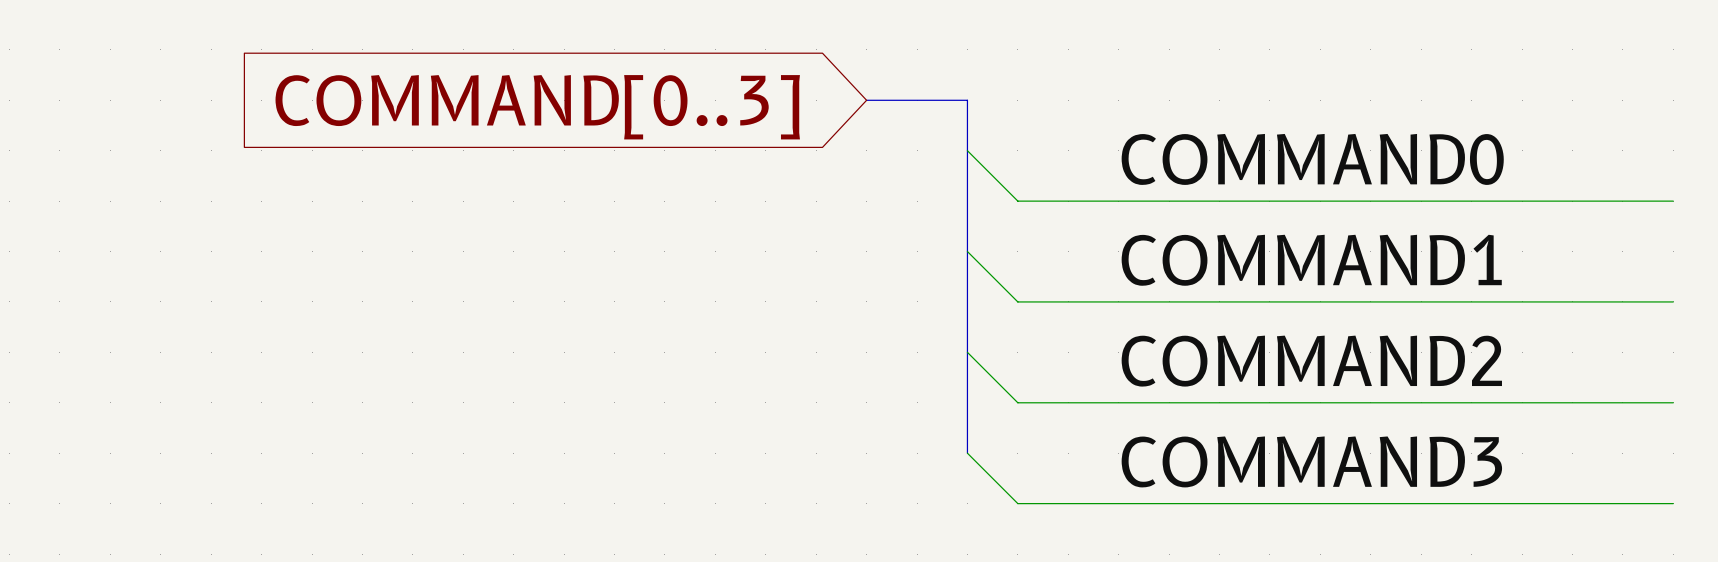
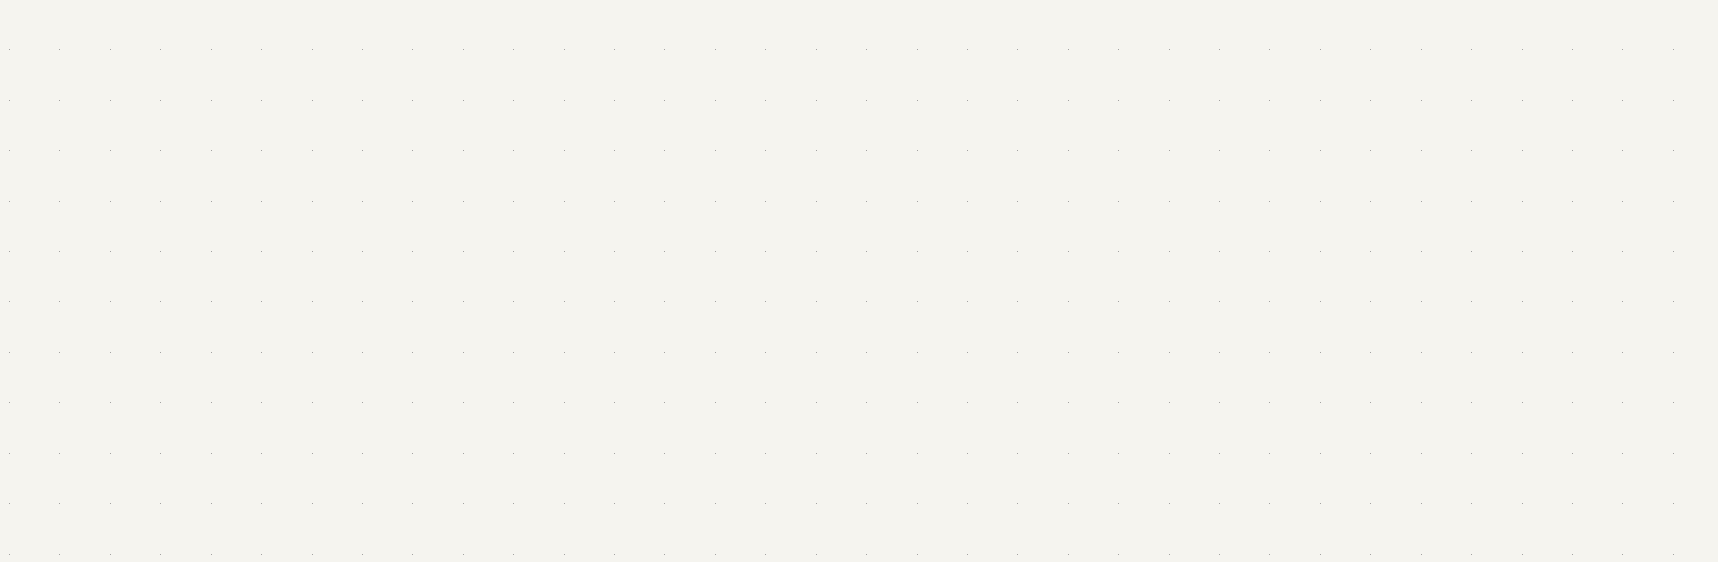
bus: (866, 100) (967, 100) (967, 453) -> none
global label: COMMAND[0..3] (537, 107) -> none
wire: (967, 150) (1017, 201) (1673, 201) -> none
label: COMMAND0 (1312, 159) -> none
wire: (967, 251) (1017, 301) (1673, 301) -> none
label: COMMAND1 (1311, 260) -> none
wire: (967, 352) (1017, 402) (1673, 402) -> none
label: COMMAND2 (1311, 361) -> none
wire: (967, 453) (1017, 503) (1673, 503) -> none
label: COMMAND3 (1311, 461) -> none

